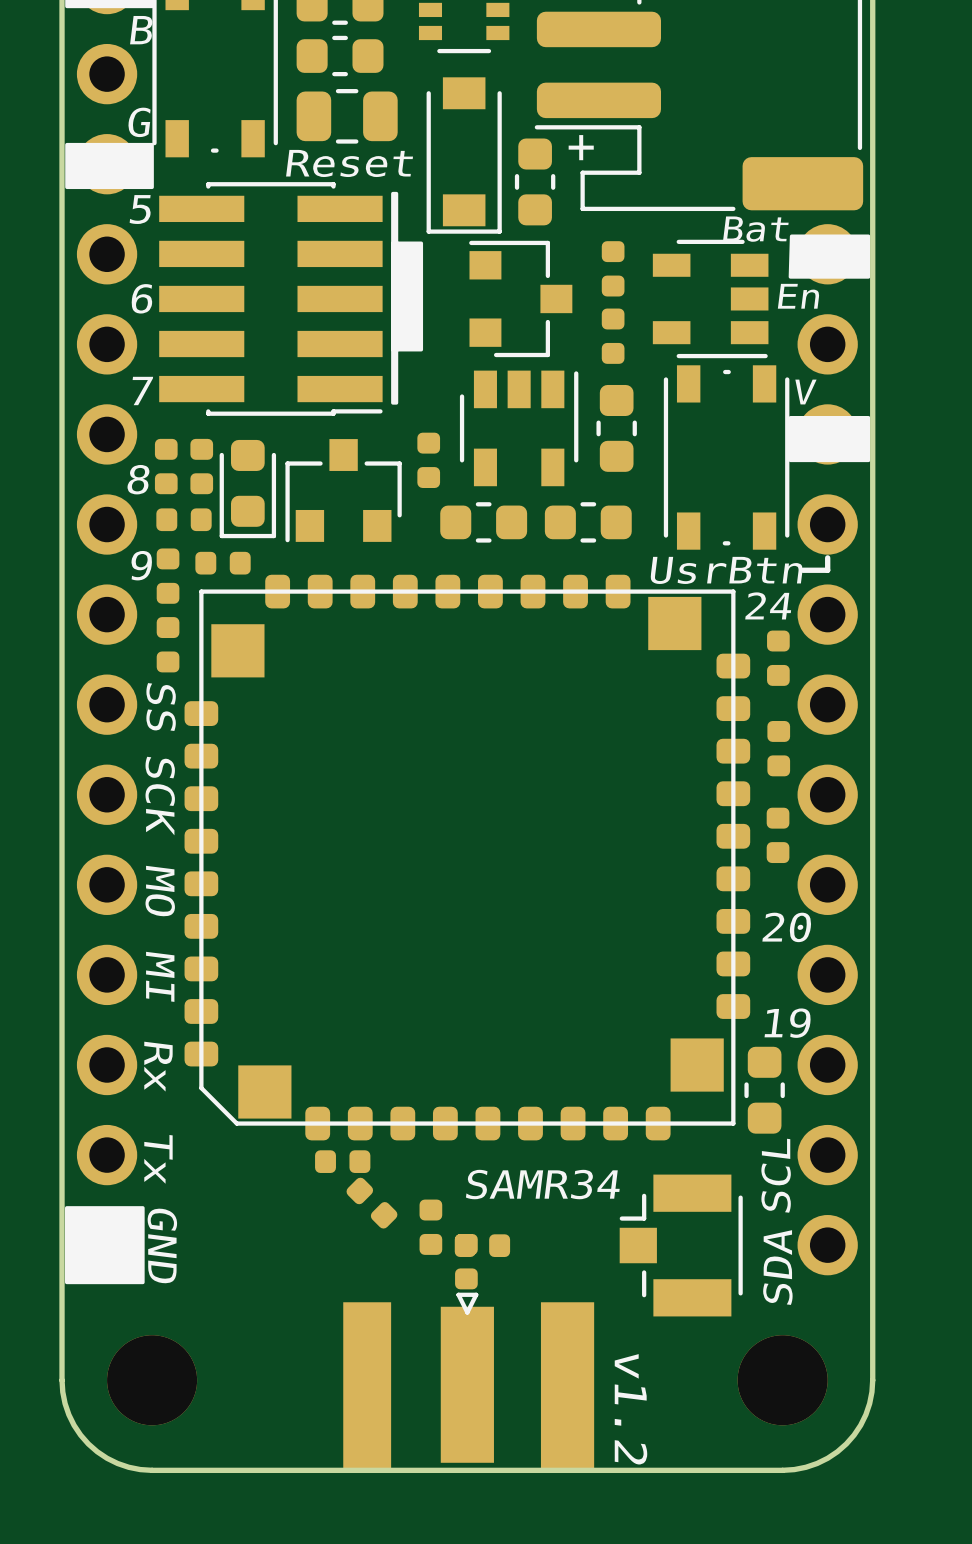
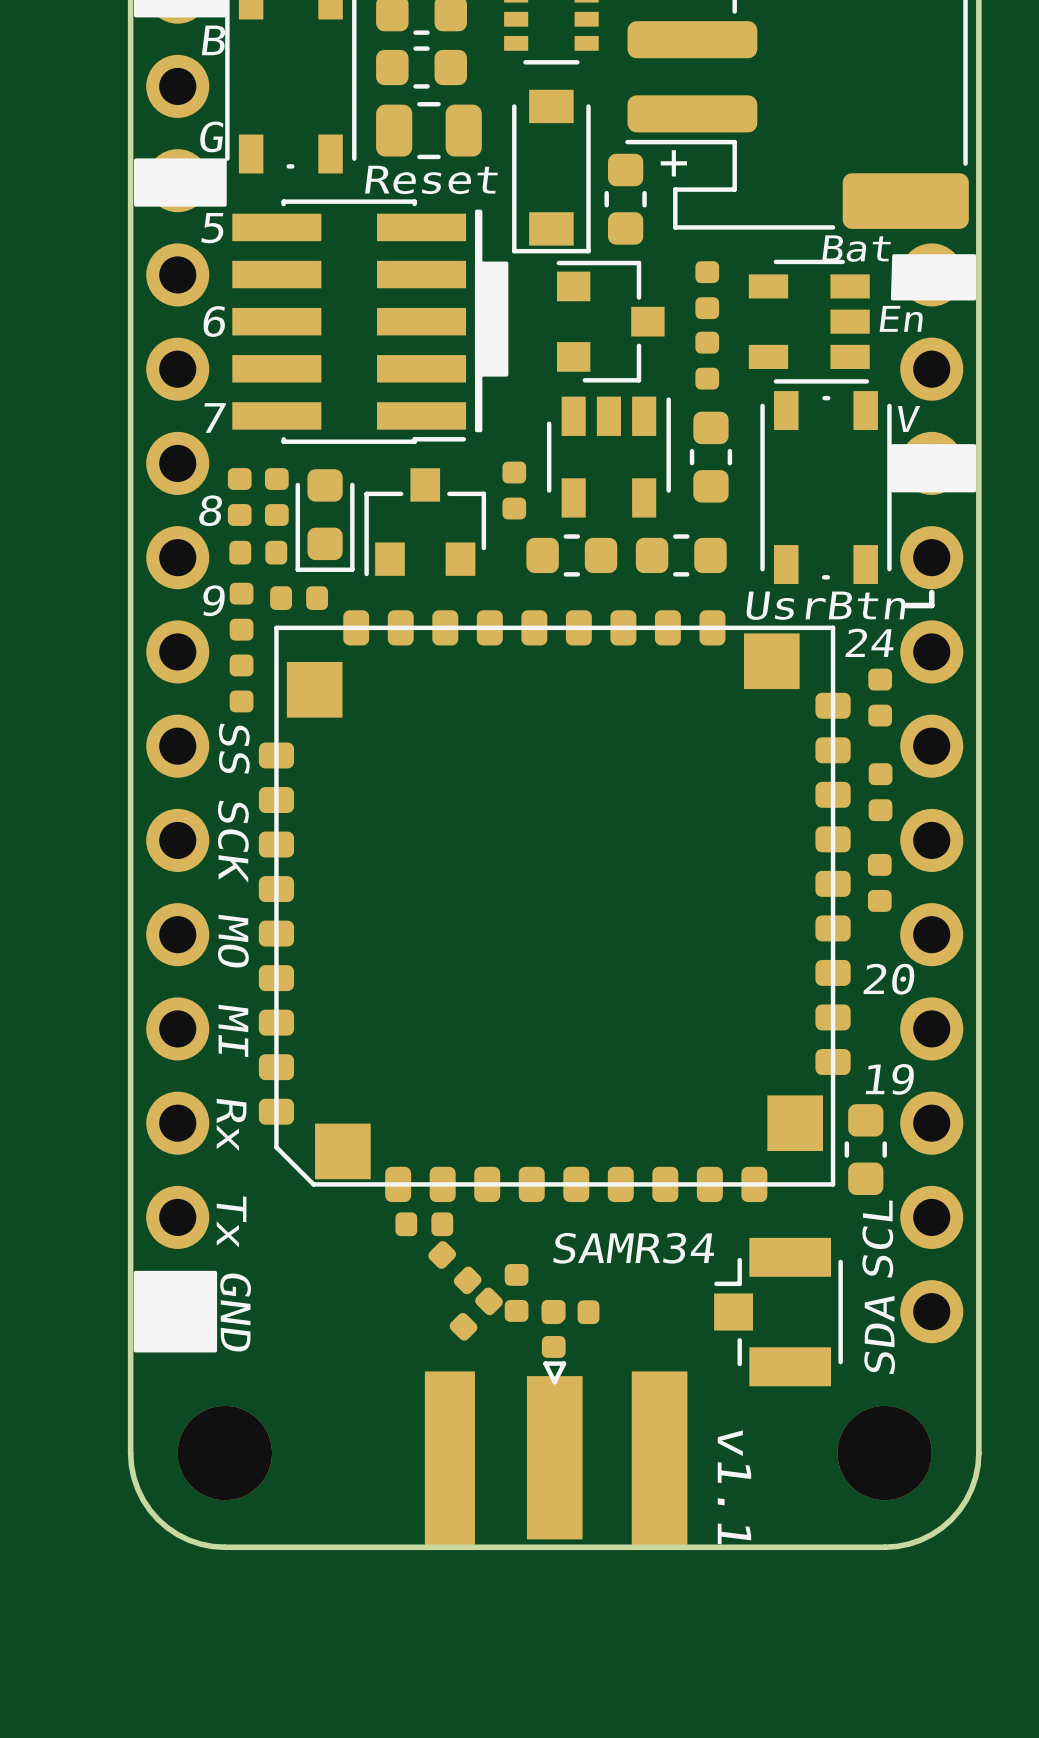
part: none -> (476, 1314)
text: v1.2 (630, 1409) -> v1.1 (734, 1487)

